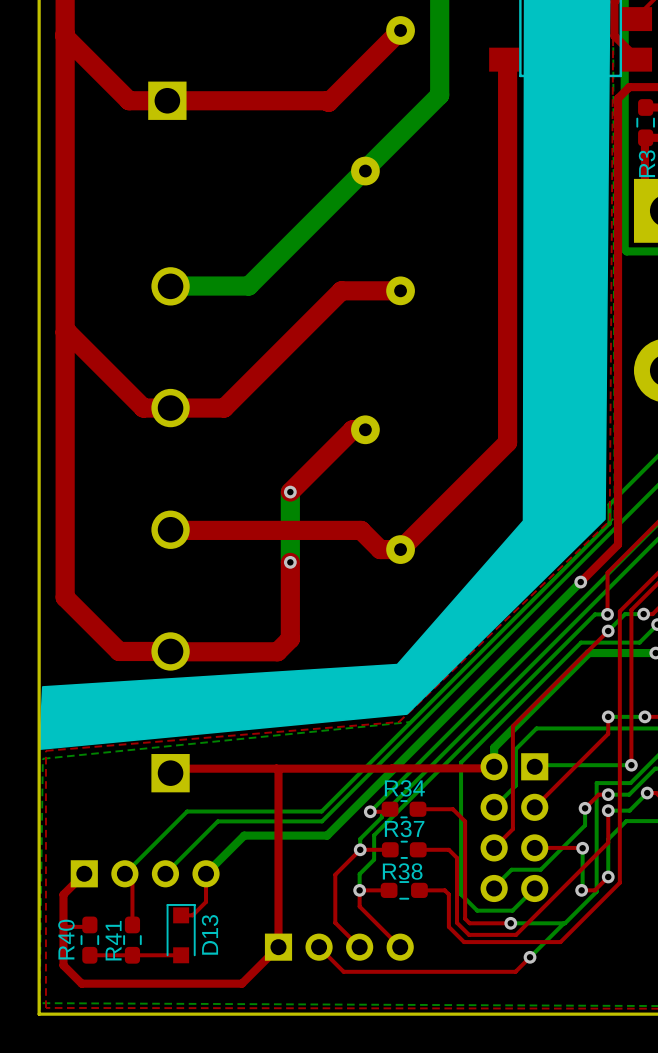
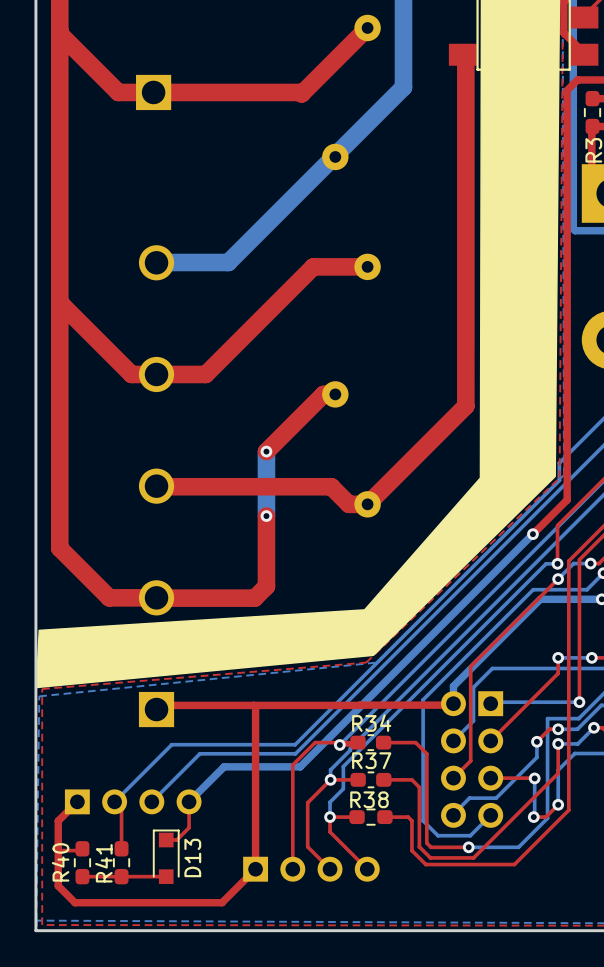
bottom track: (564, 923) (530, 957) -> none
top track: (319, 947) (343, 971) (515, 971) (530, 957) -> (292, 869) (292, 764) (315, 742) (359, 742)
via: (530, 957) -> none

